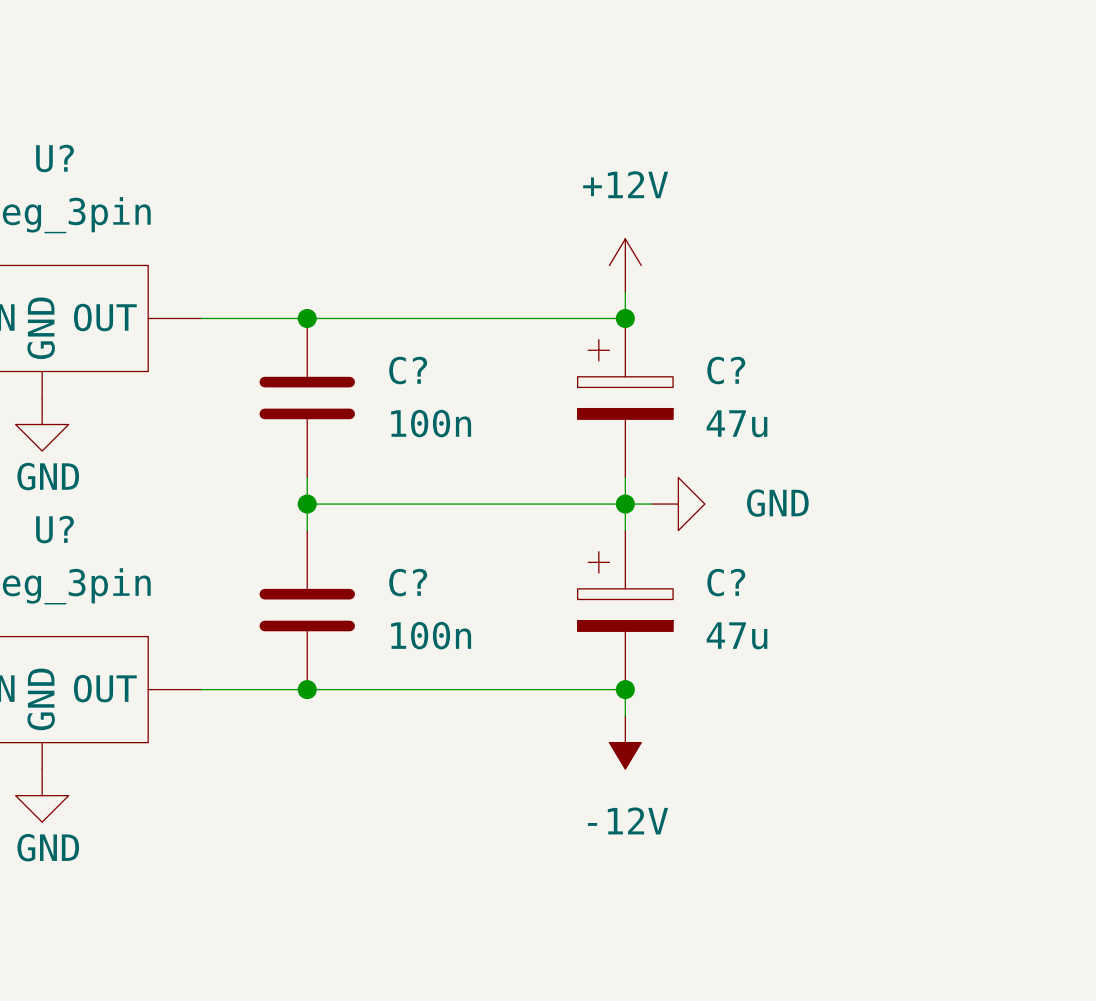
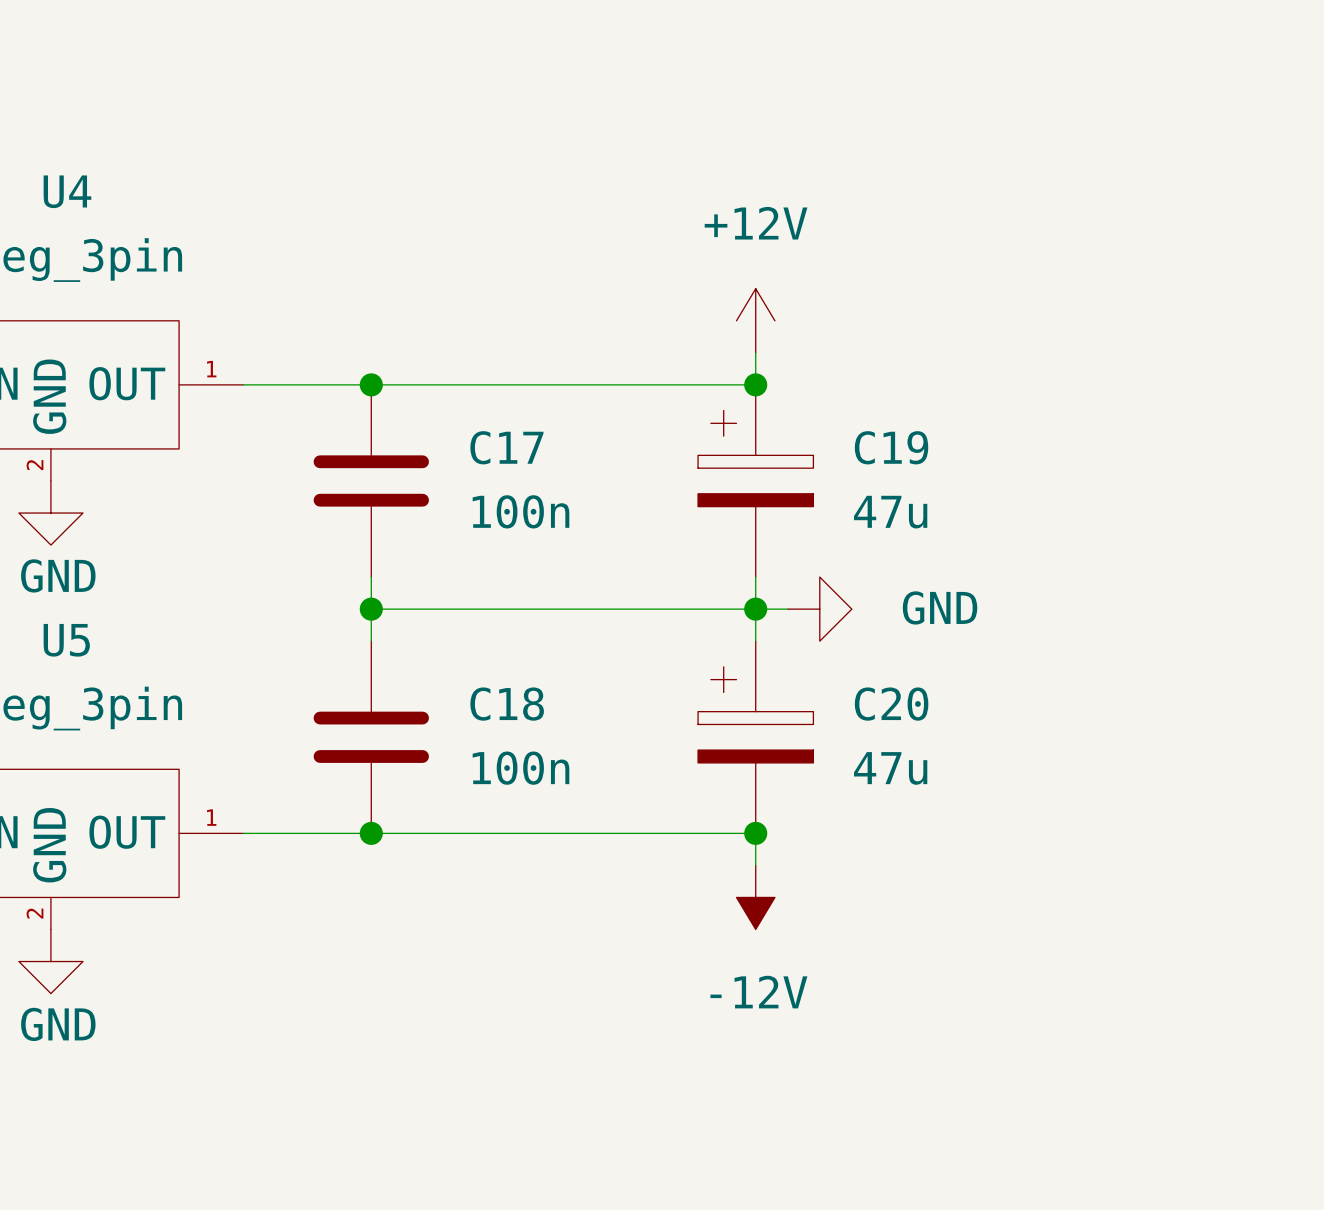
U? name: U? (54, 158) -> U4 (67, 191)
U? pin number: none -> 1 (211, 369)
C? name: C? (408, 370) -> C17 (506, 447)
C? name: C? (726, 370) -> C19 (891, 447)
U? pin number: none -> 2 (35, 465)
U? name: U? (54, 529) -> U5 (66, 640)
C? name: C? (408, 582) -> C18 (507, 704)
C? name: C? (726, 582) -> C20 (891, 704)
U? pin number: none -> 1 (211, 817)
U? pin number: none -> 2 (35, 913)

